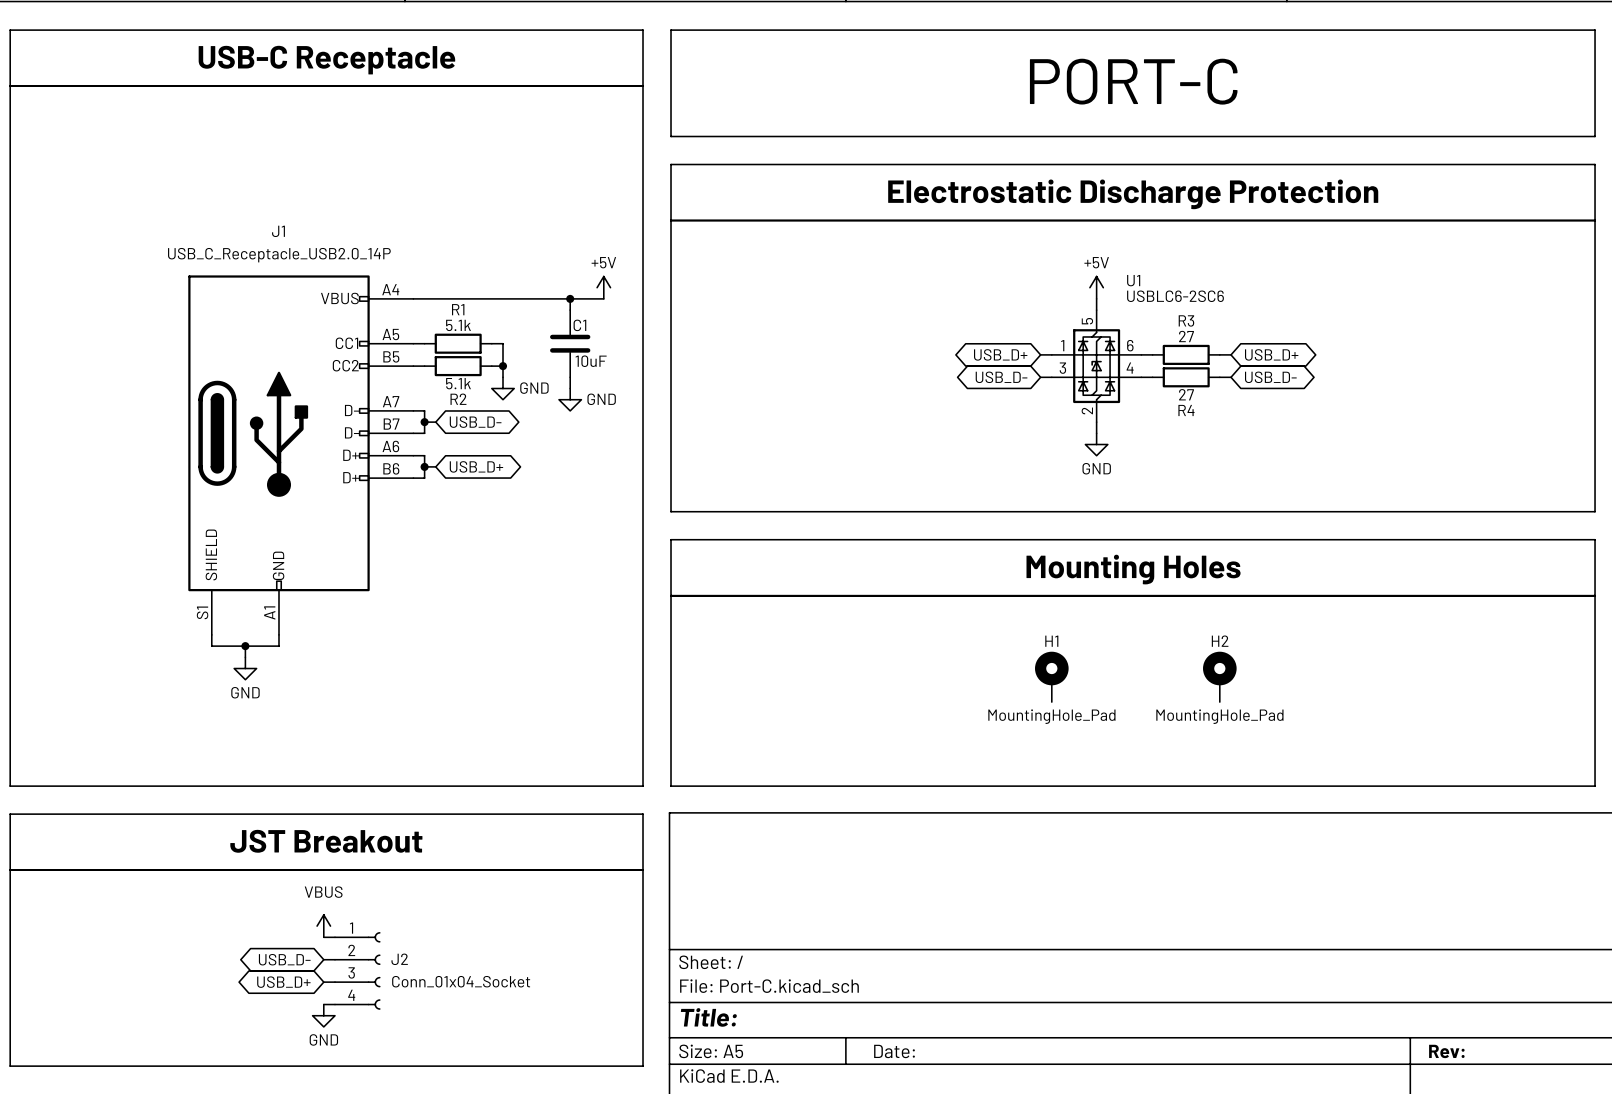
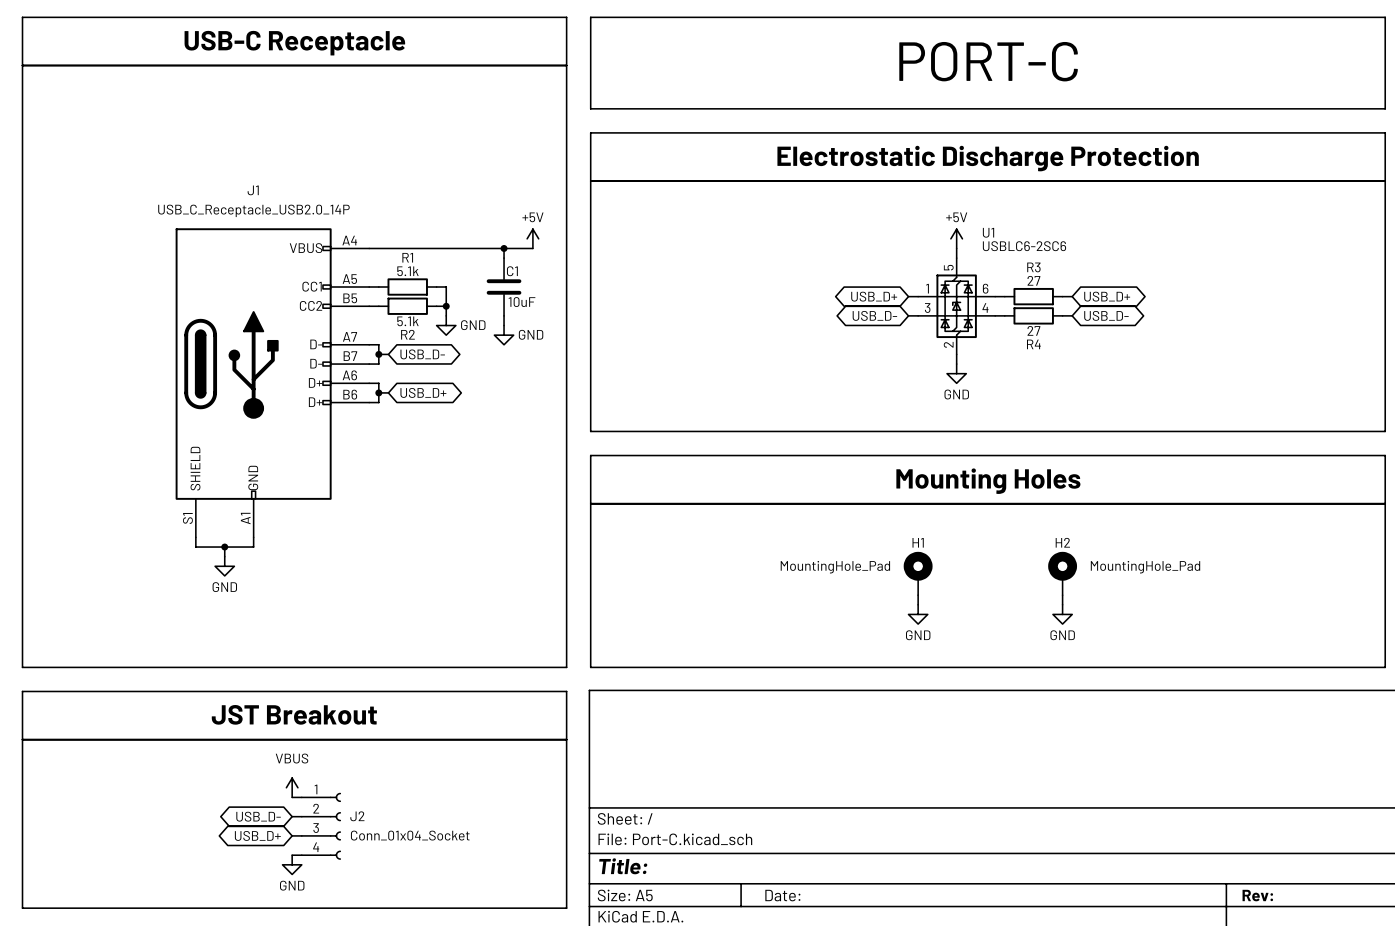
wire: none -> (918, 595) (918, 604)
wire: none -> (1062, 595) (1062, 604)
H1 value position: MountingHole_Pad (1051, 716) -> MountingHole_Pad (835, 567)
H2 value position: MountingHole_Pad (1219, 716) -> MountingHole_Pad (1145, 567)
power symbol: none -> GND (918, 614)
power symbol: none -> GND (1062, 614)

